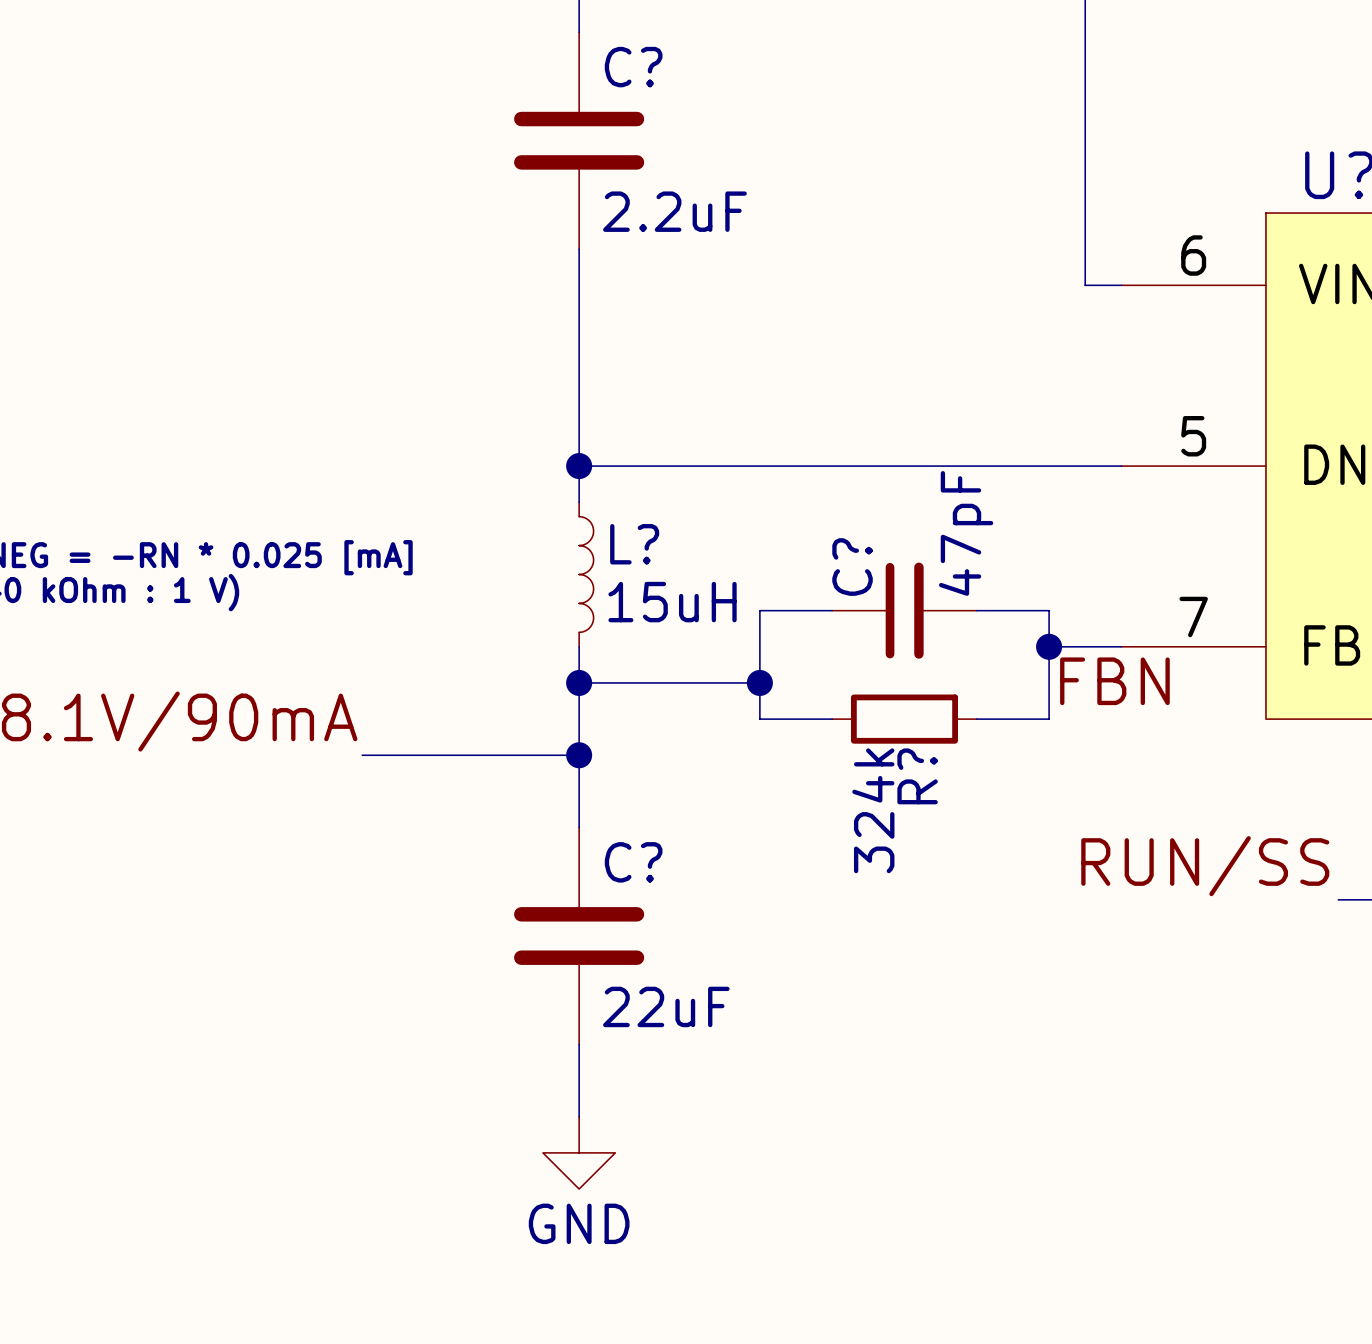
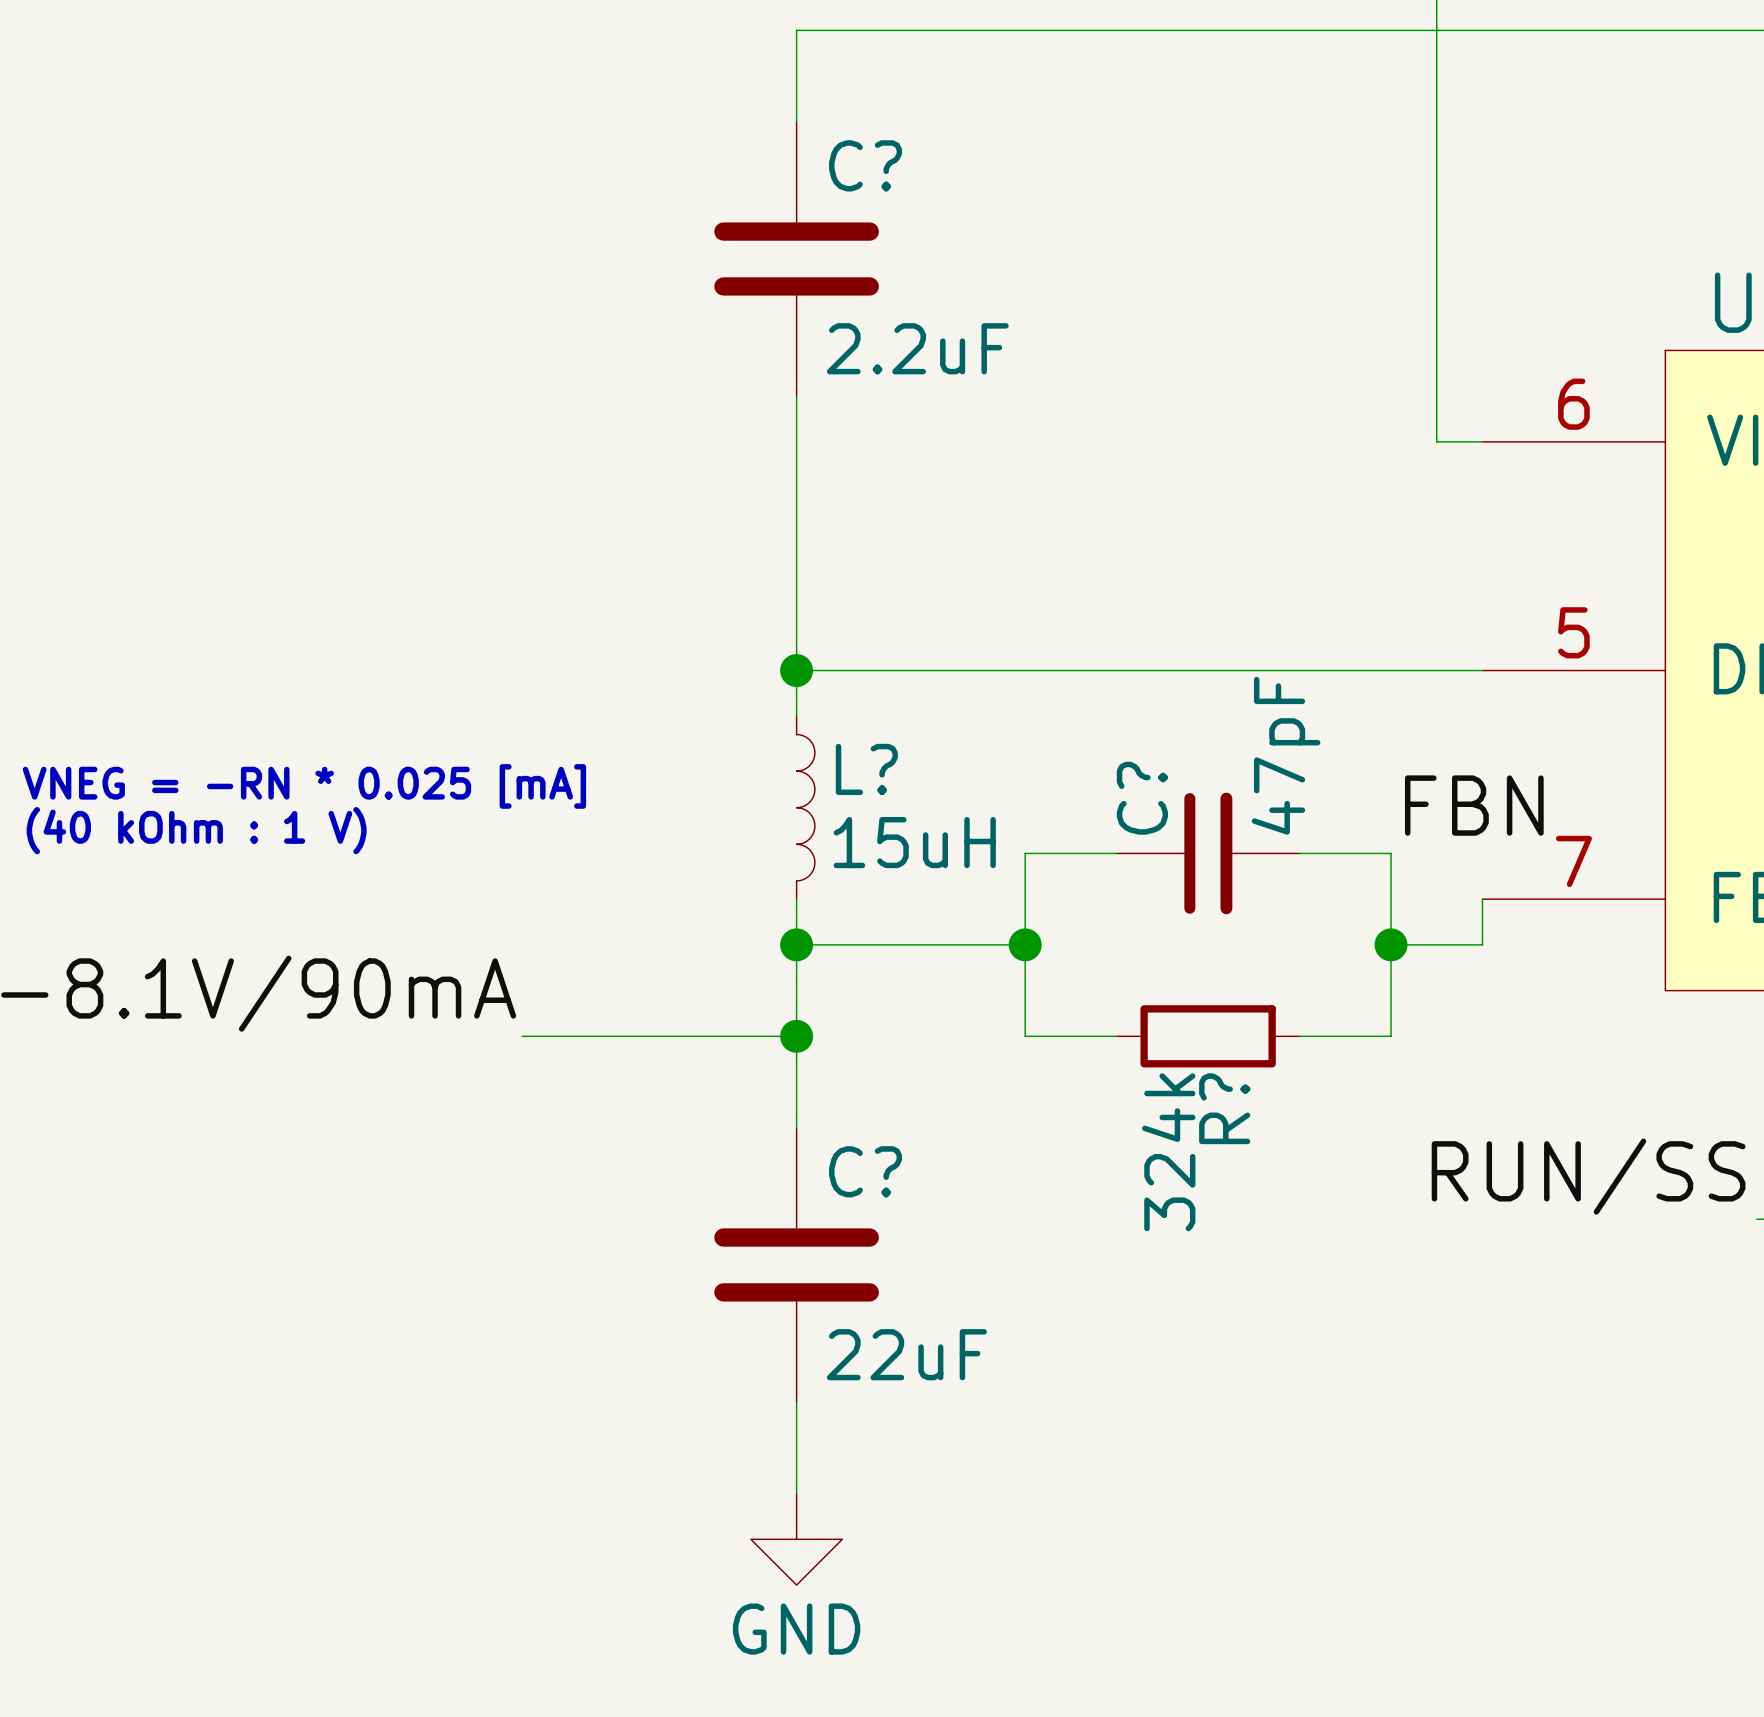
wire: (1049, 646) (1121, 646) -> (1391, 944) (1482, 944) (1482, 899)
junction position: (1049, 646) -> (1391, 944)
label position: FBN (1114, 681) -> FBN (1474, 805)
wire: (759, 719) (832, 719) -> (1025, 990) (1025, 1036) (1116, 1036)
R? position: (904, 719) -> (1208, 1036)
wire: (976, 719) (1049, 719) -> (1299, 1036) (1391, 1036) (1391, 990)

